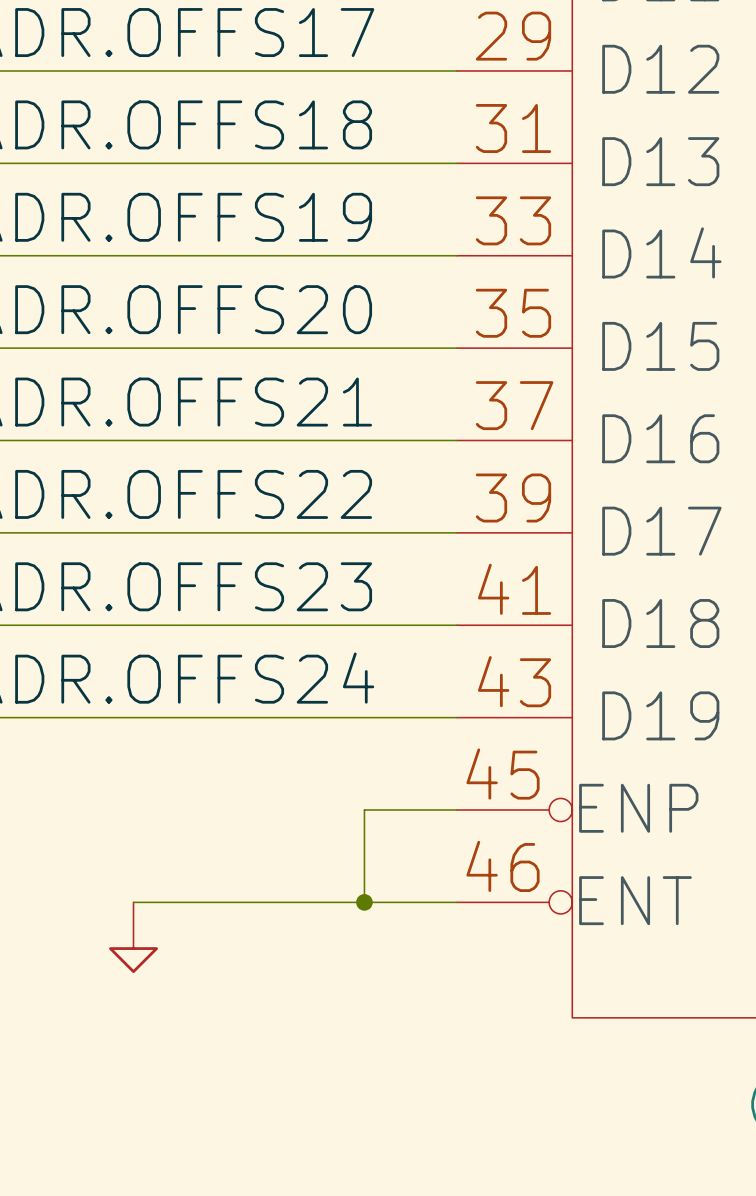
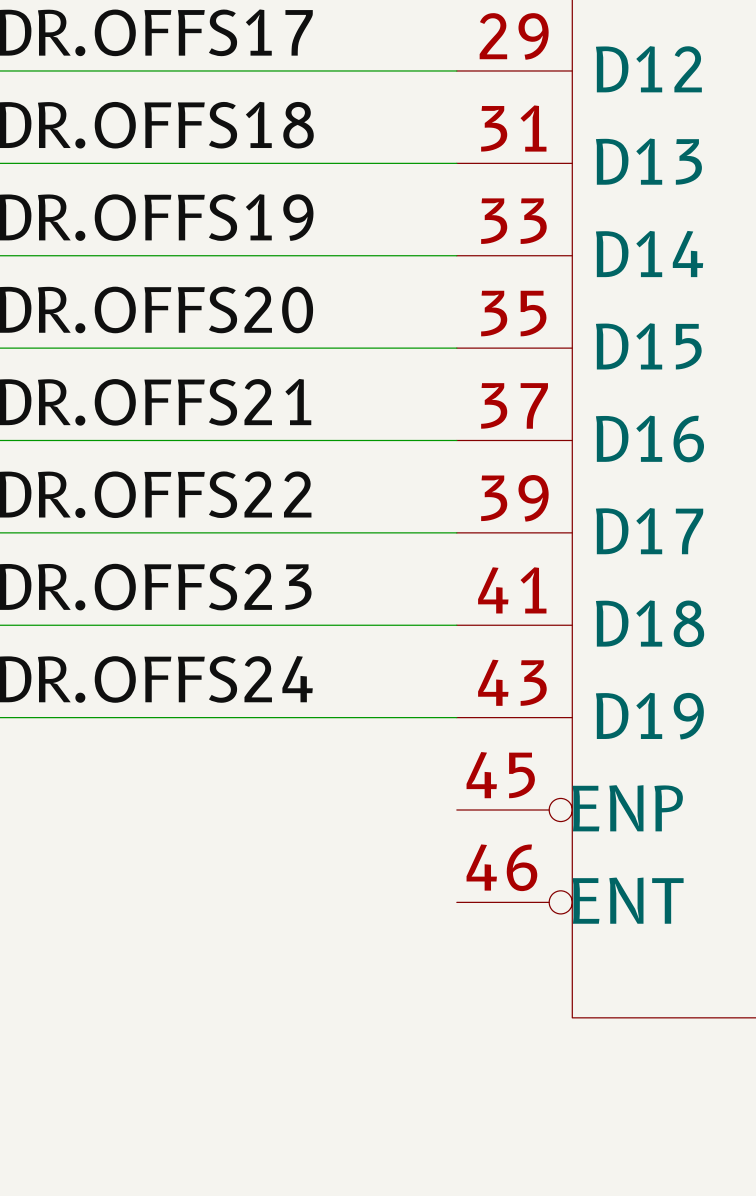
wire: (456, 810) (364, 810) (364, 902) -> none
wire: (133, 902) (456, 902) -> none
junction: (364, 902) -> none
power symbol: (133, 937) -> none

